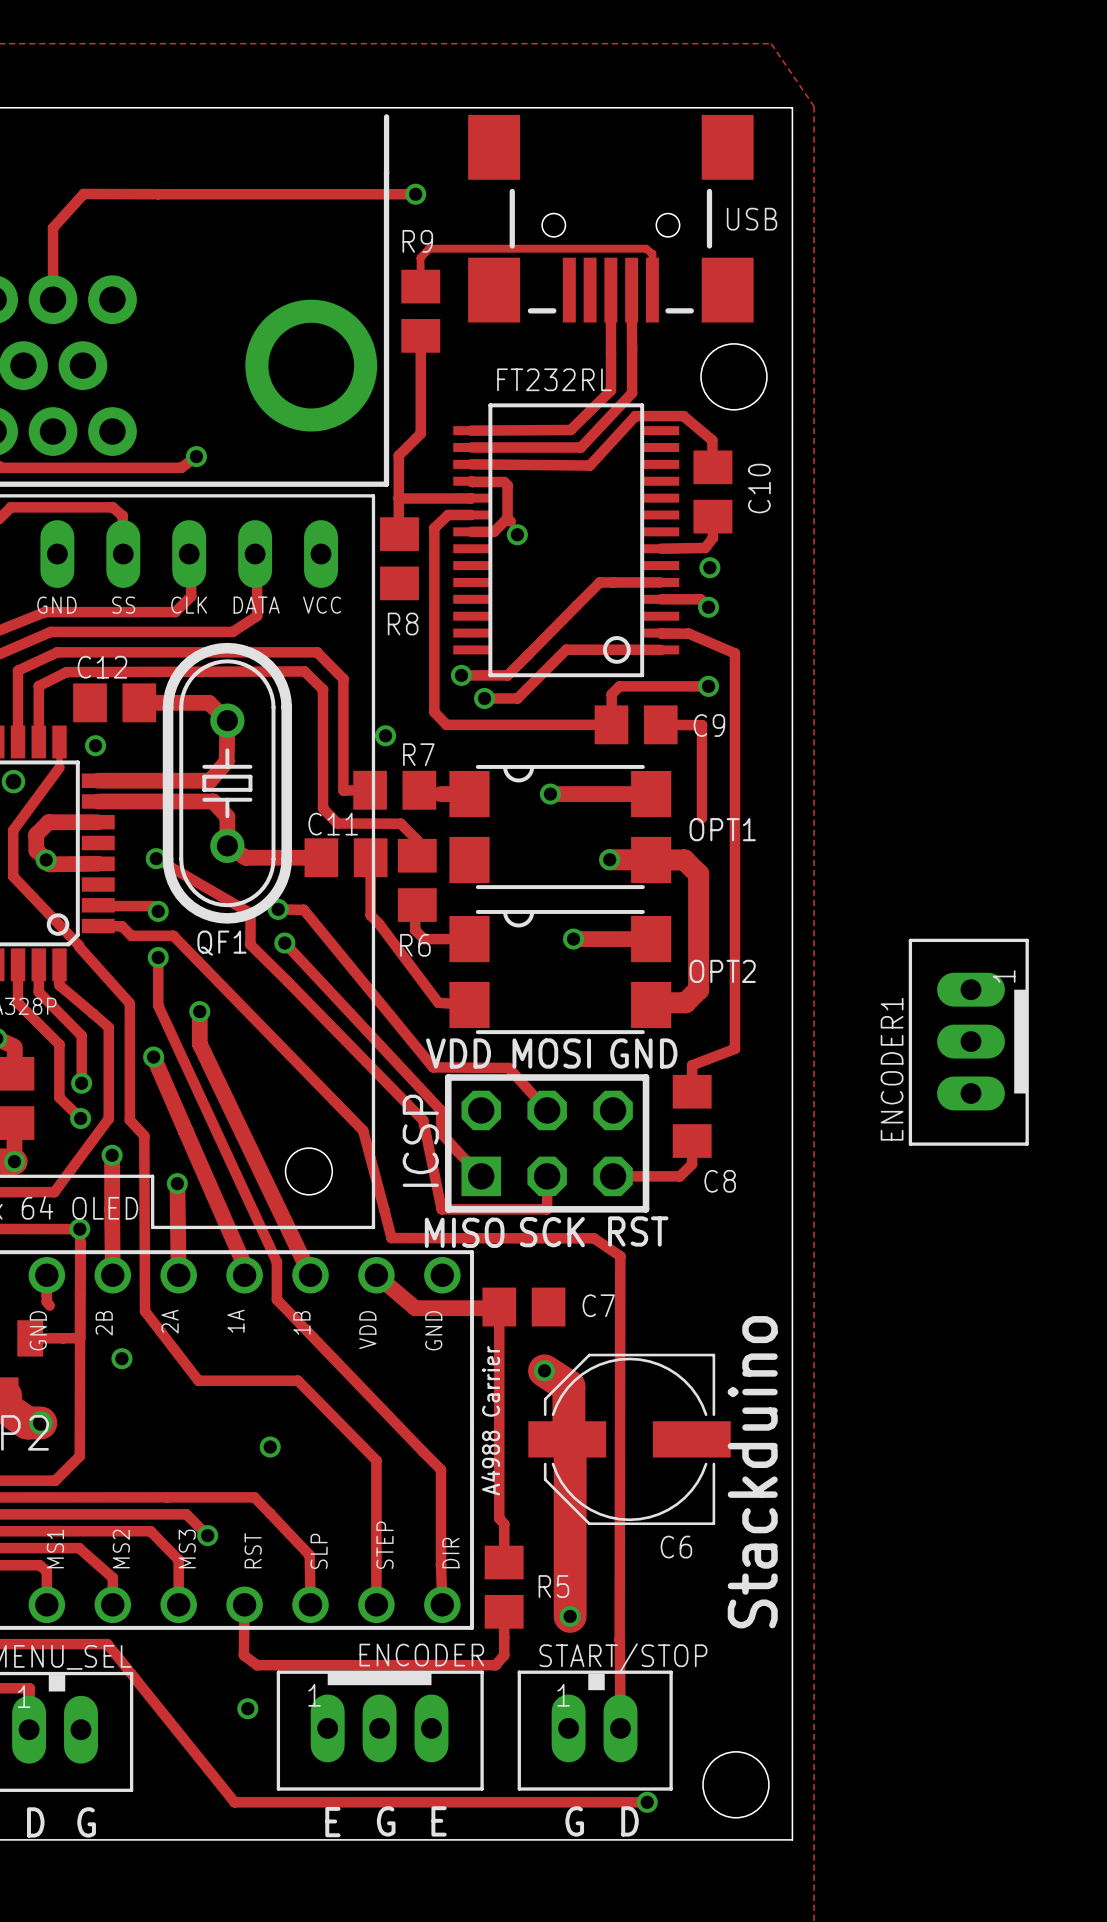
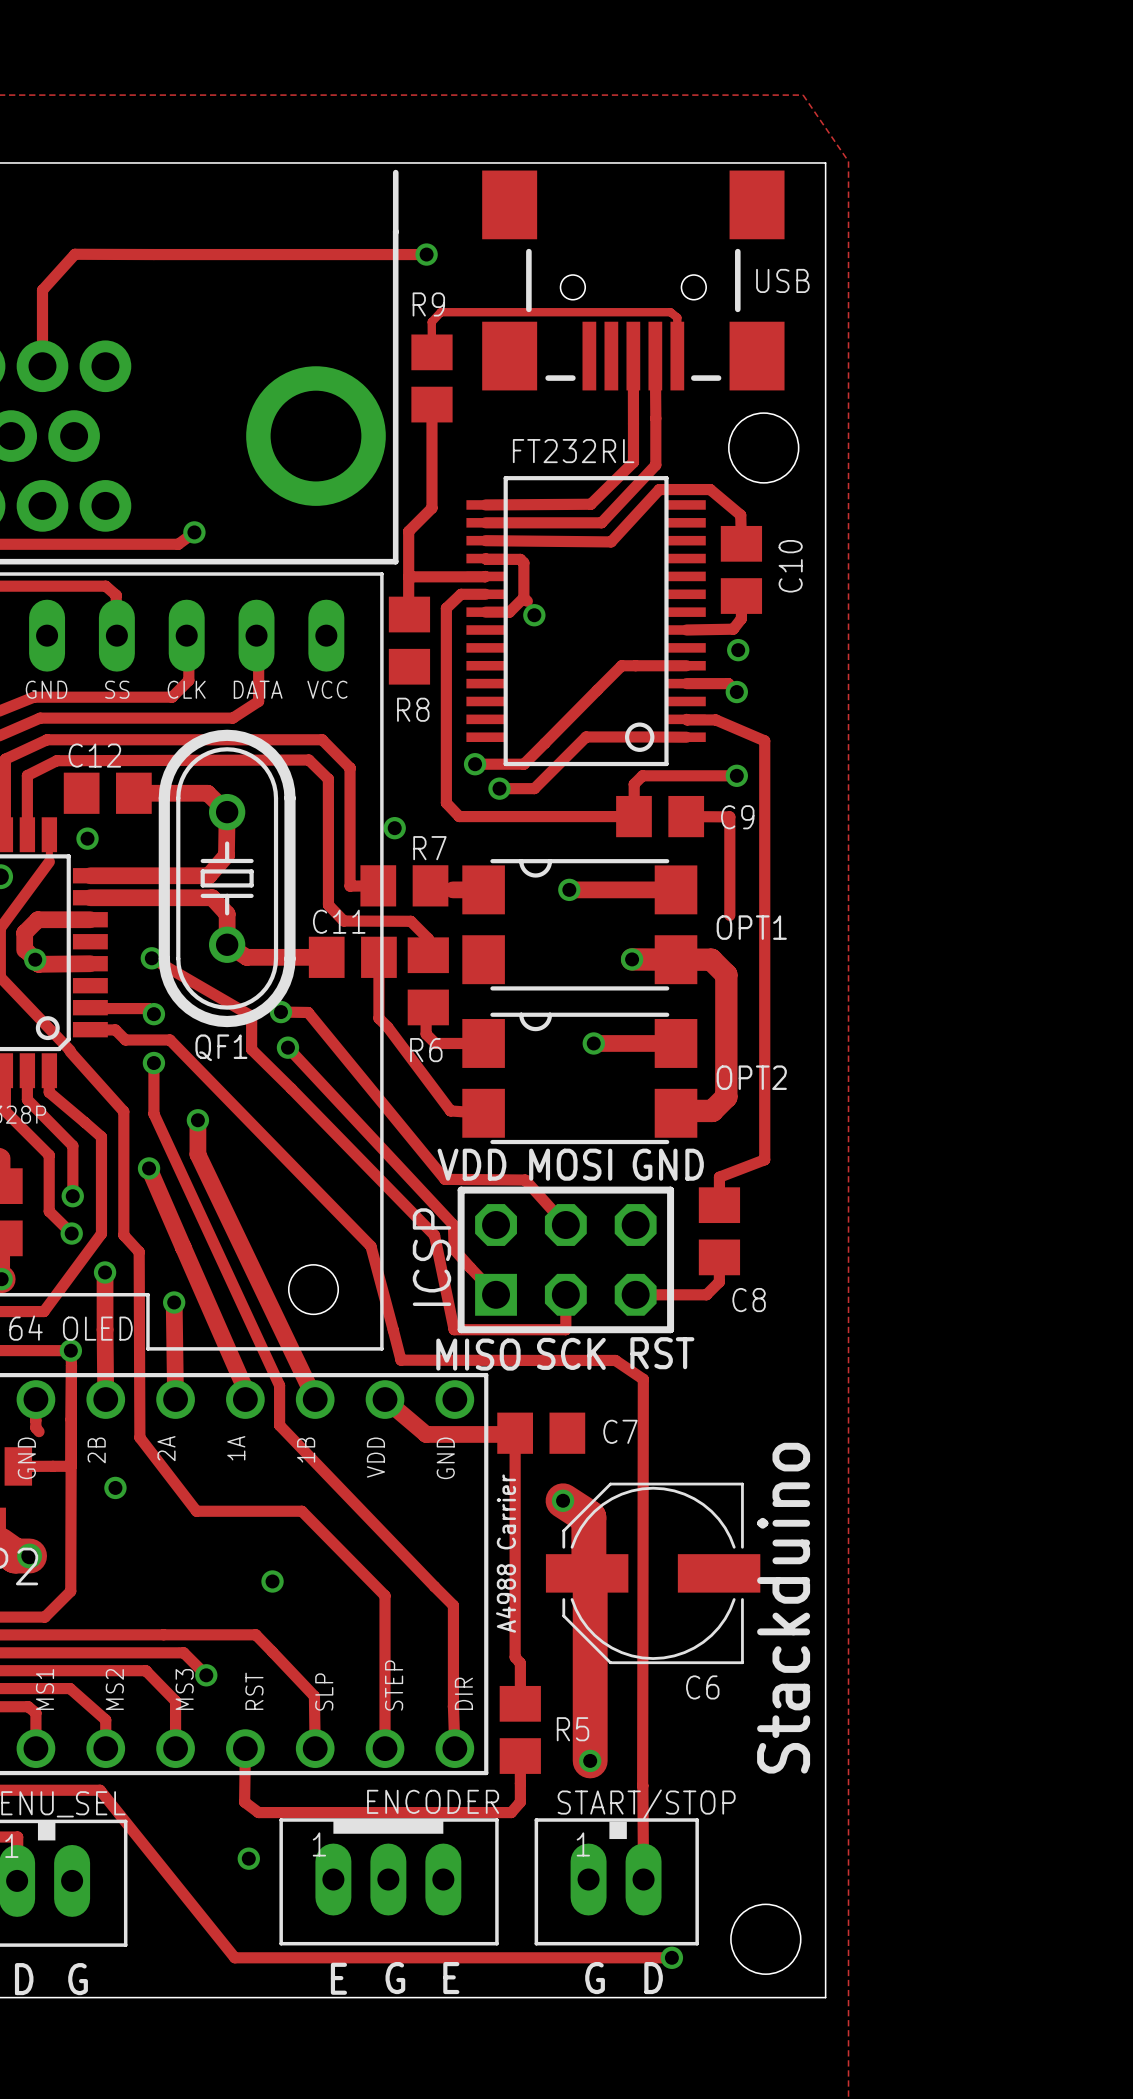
ENCODER1: (968, 1042) -> none

